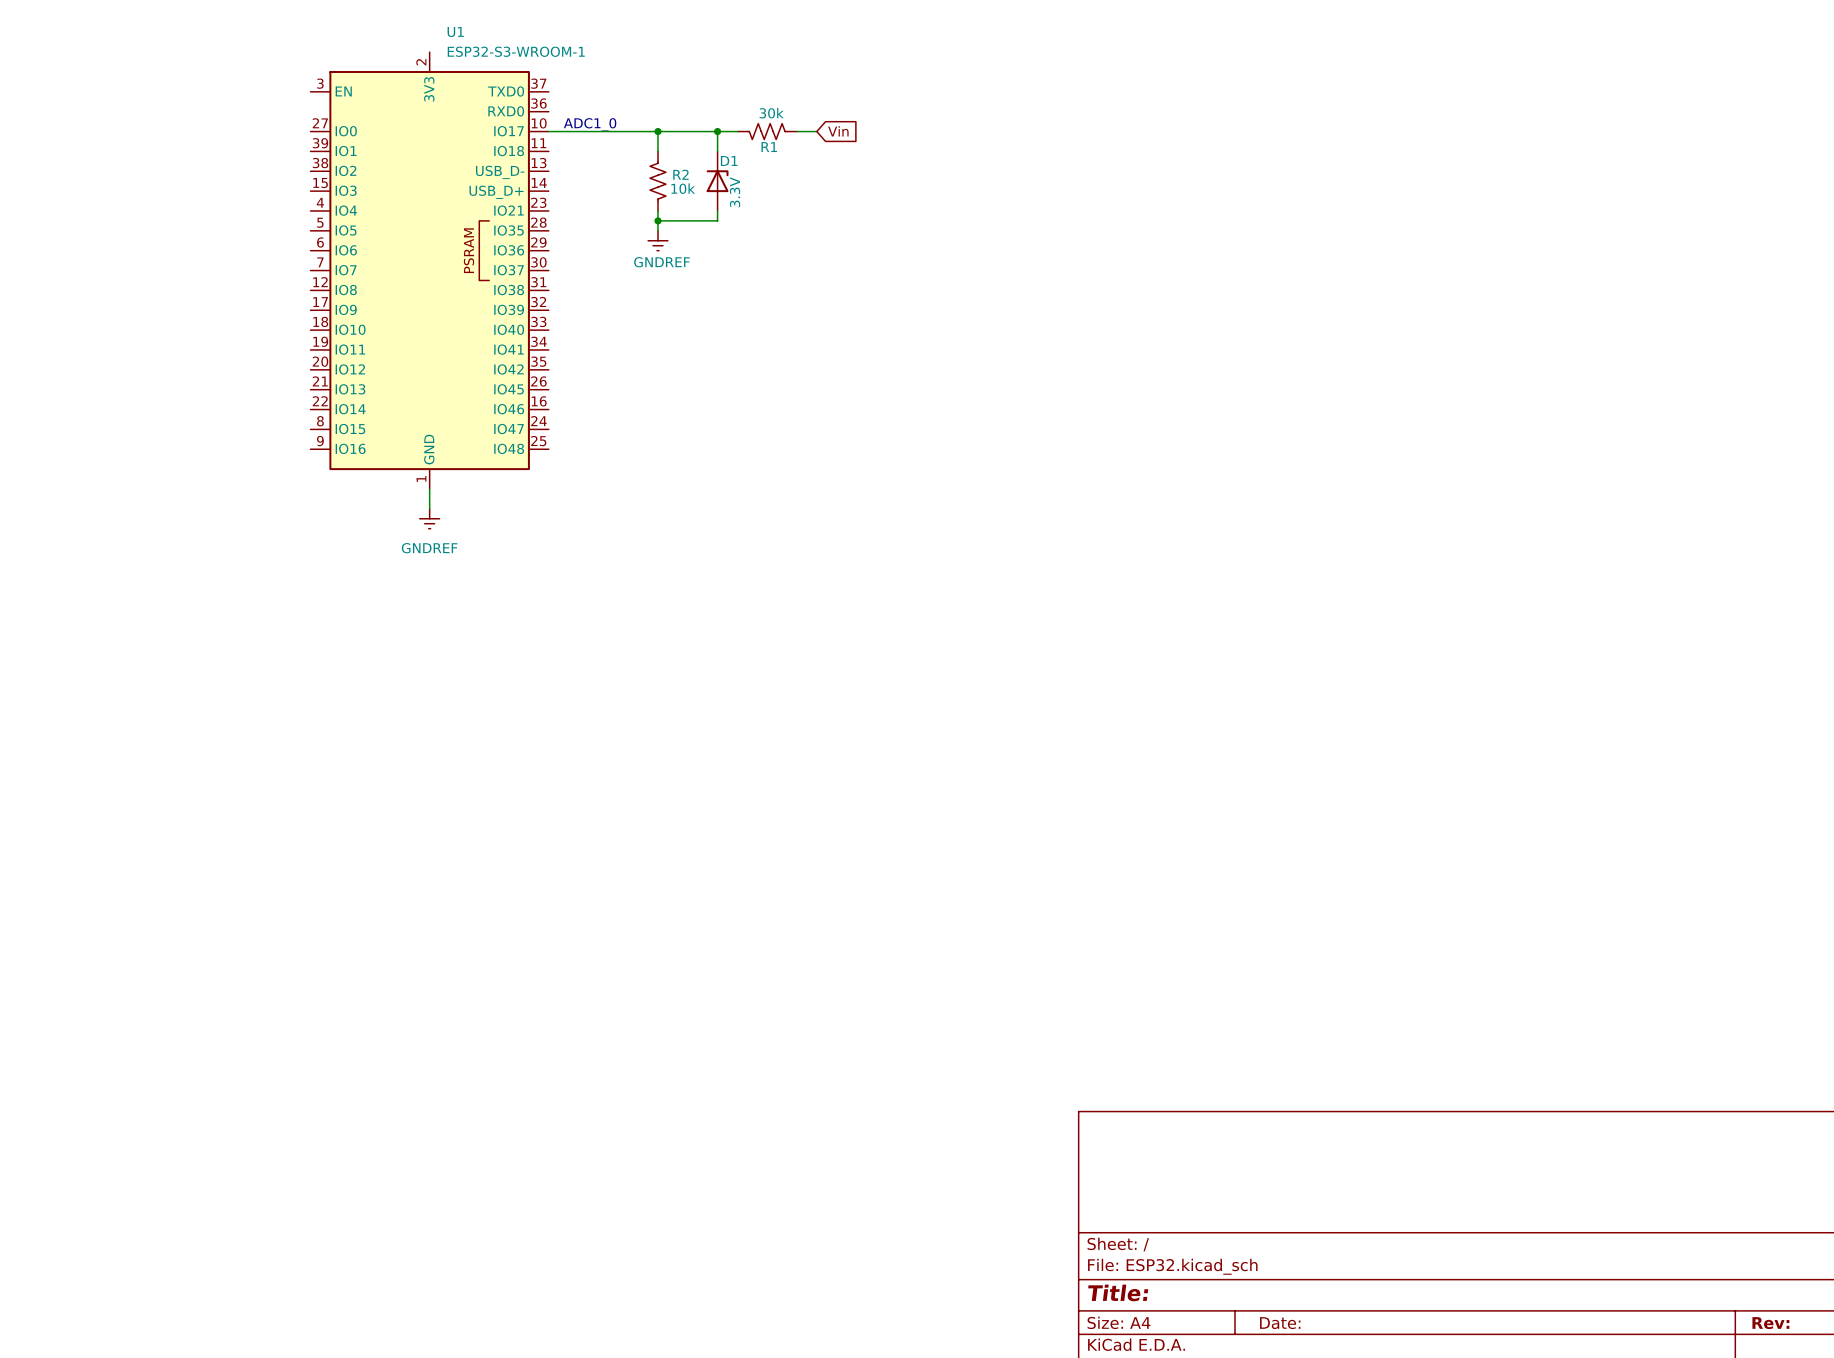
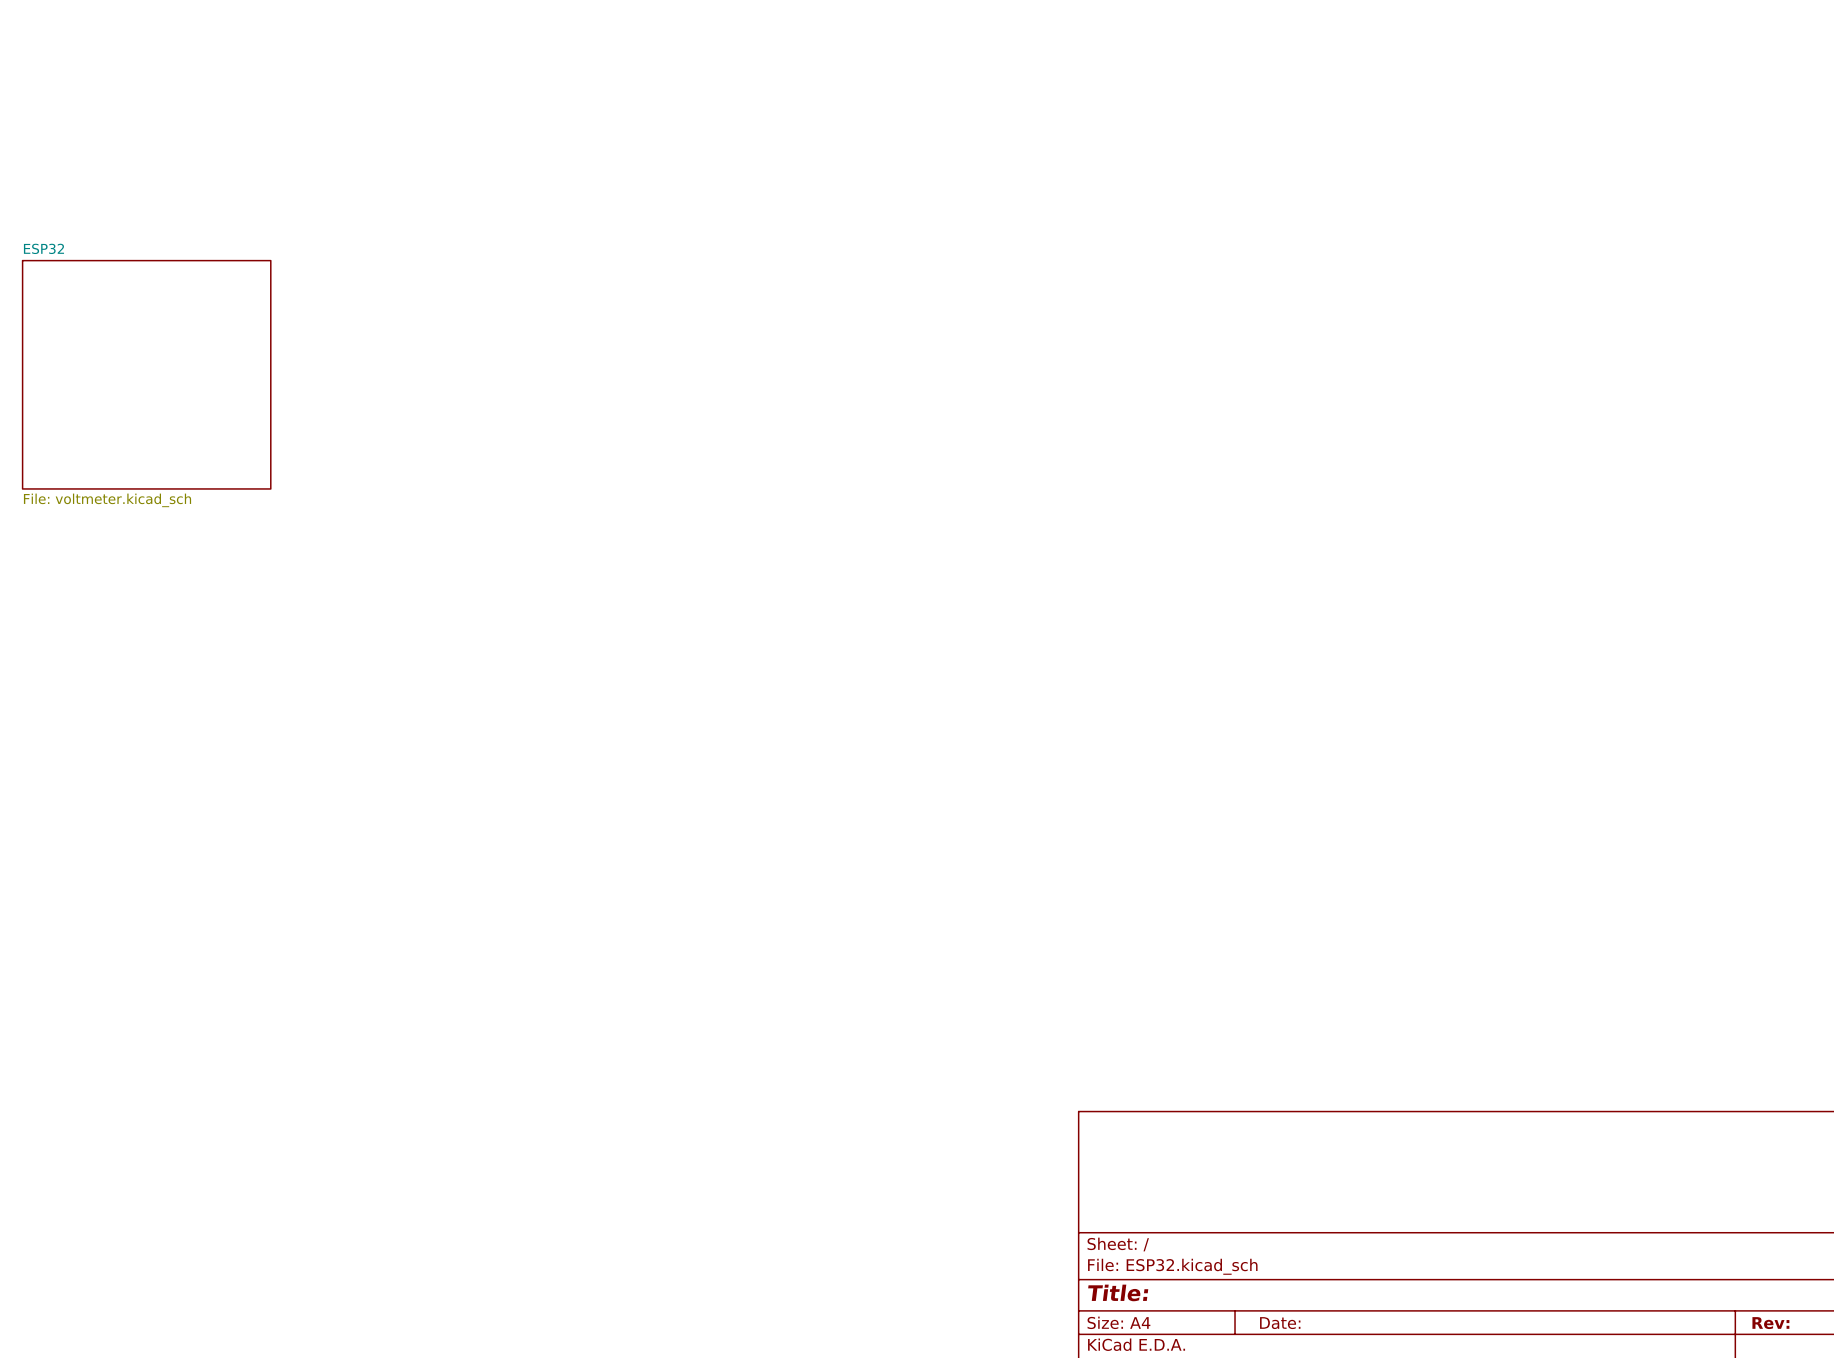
text: ADC1_0 (590, 124) -> none
wire: (548, 131) (737, 131) -> none
wire: (658, 131) (658, 151) -> none
junction: (658, 131) -> none
wire: (717, 131) (717, 151) -> none
junction: (717, 131) -> none
R1: 30k (767, 131) -> none
wire: (796, 131) (816, 131) -> none
global label: Vin (838, 131) -> none
R2: 10k (658, 181) -> none
D1: 3.3V (717, 181) -> none
wire: (658, 210) (658, 230) -> none
wire: (717, 210) (717, 220) (658, 220) -> none
junction: (658, 220) -> none
power symbol: GNDREF (658, 240) -> none
U1: ESP32-S3-WROOM-1 (429, 270) -> none
sheet ESP32: none -> File: voltmeter.kicad_sch (146, 374)
wire: (429, 488) (429, 508) -> none
power symbol: GNDREF (429, 518) -> none

